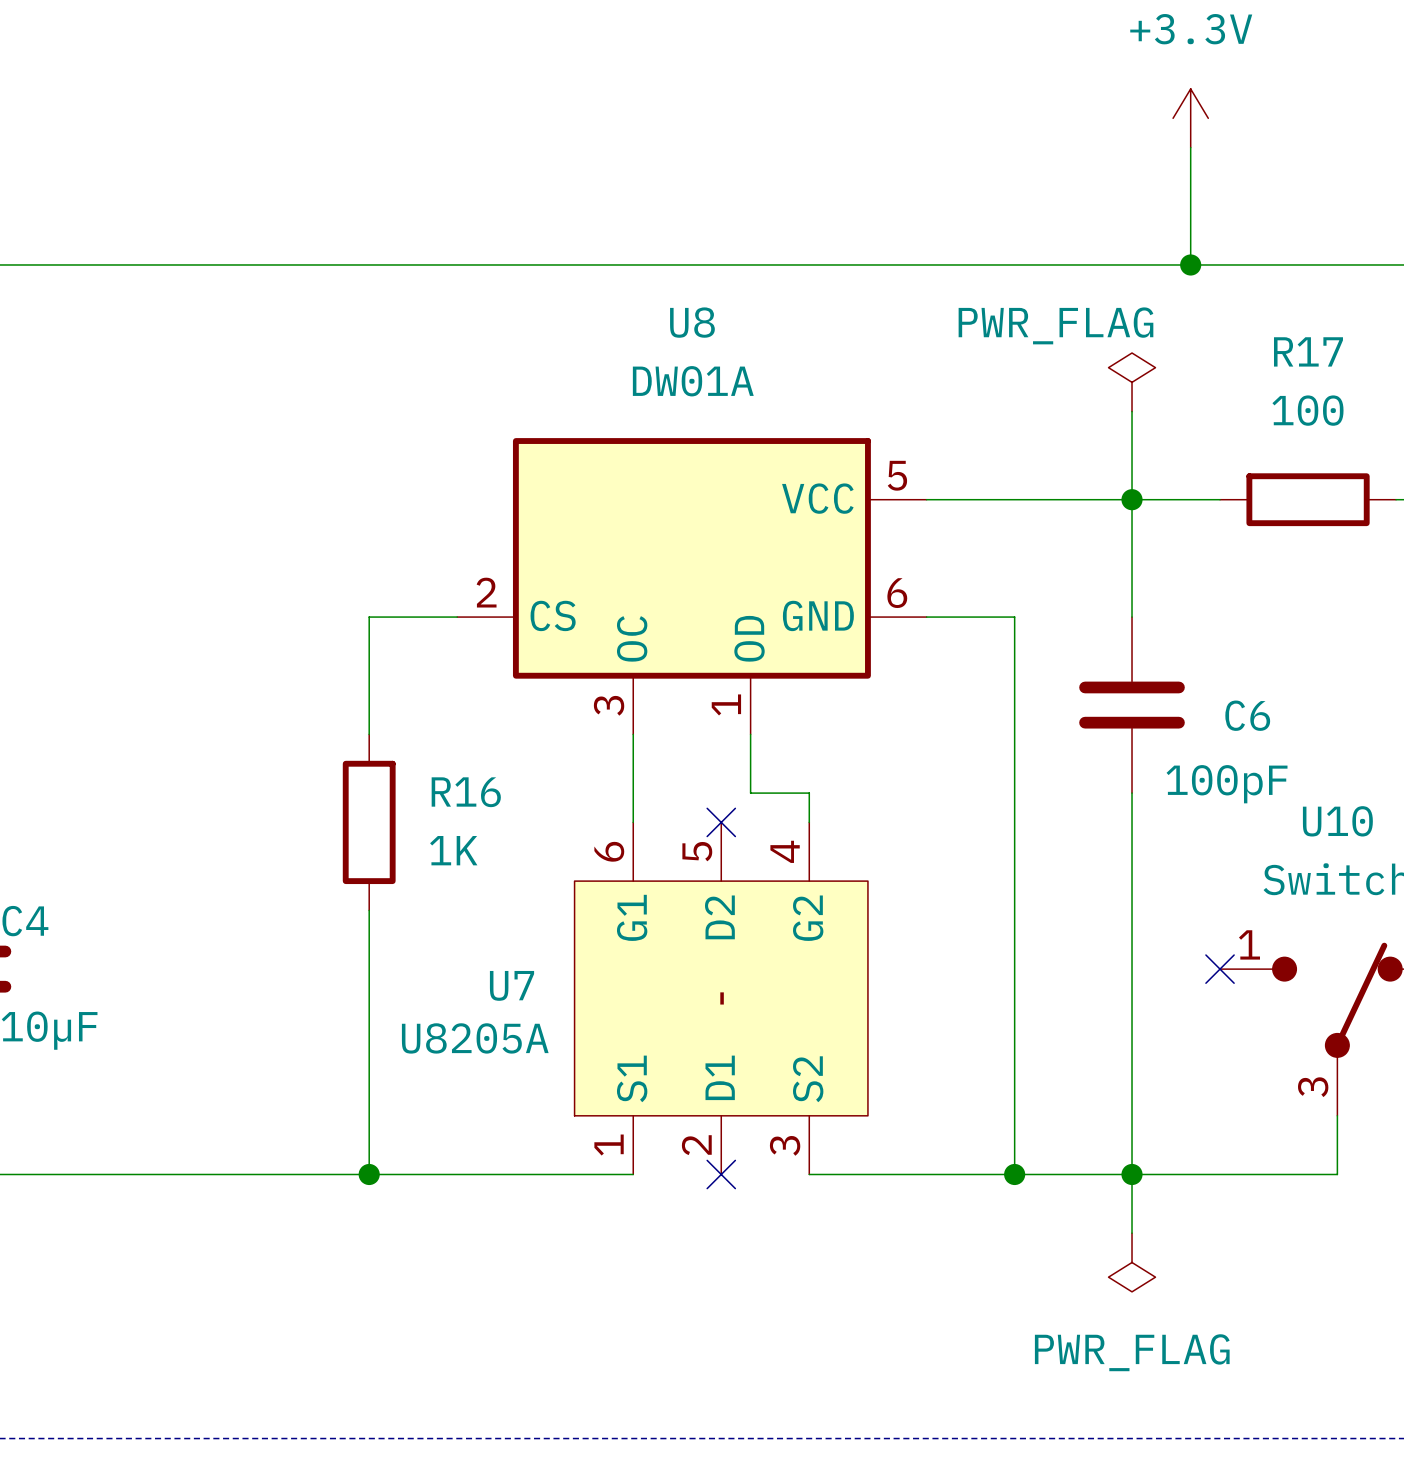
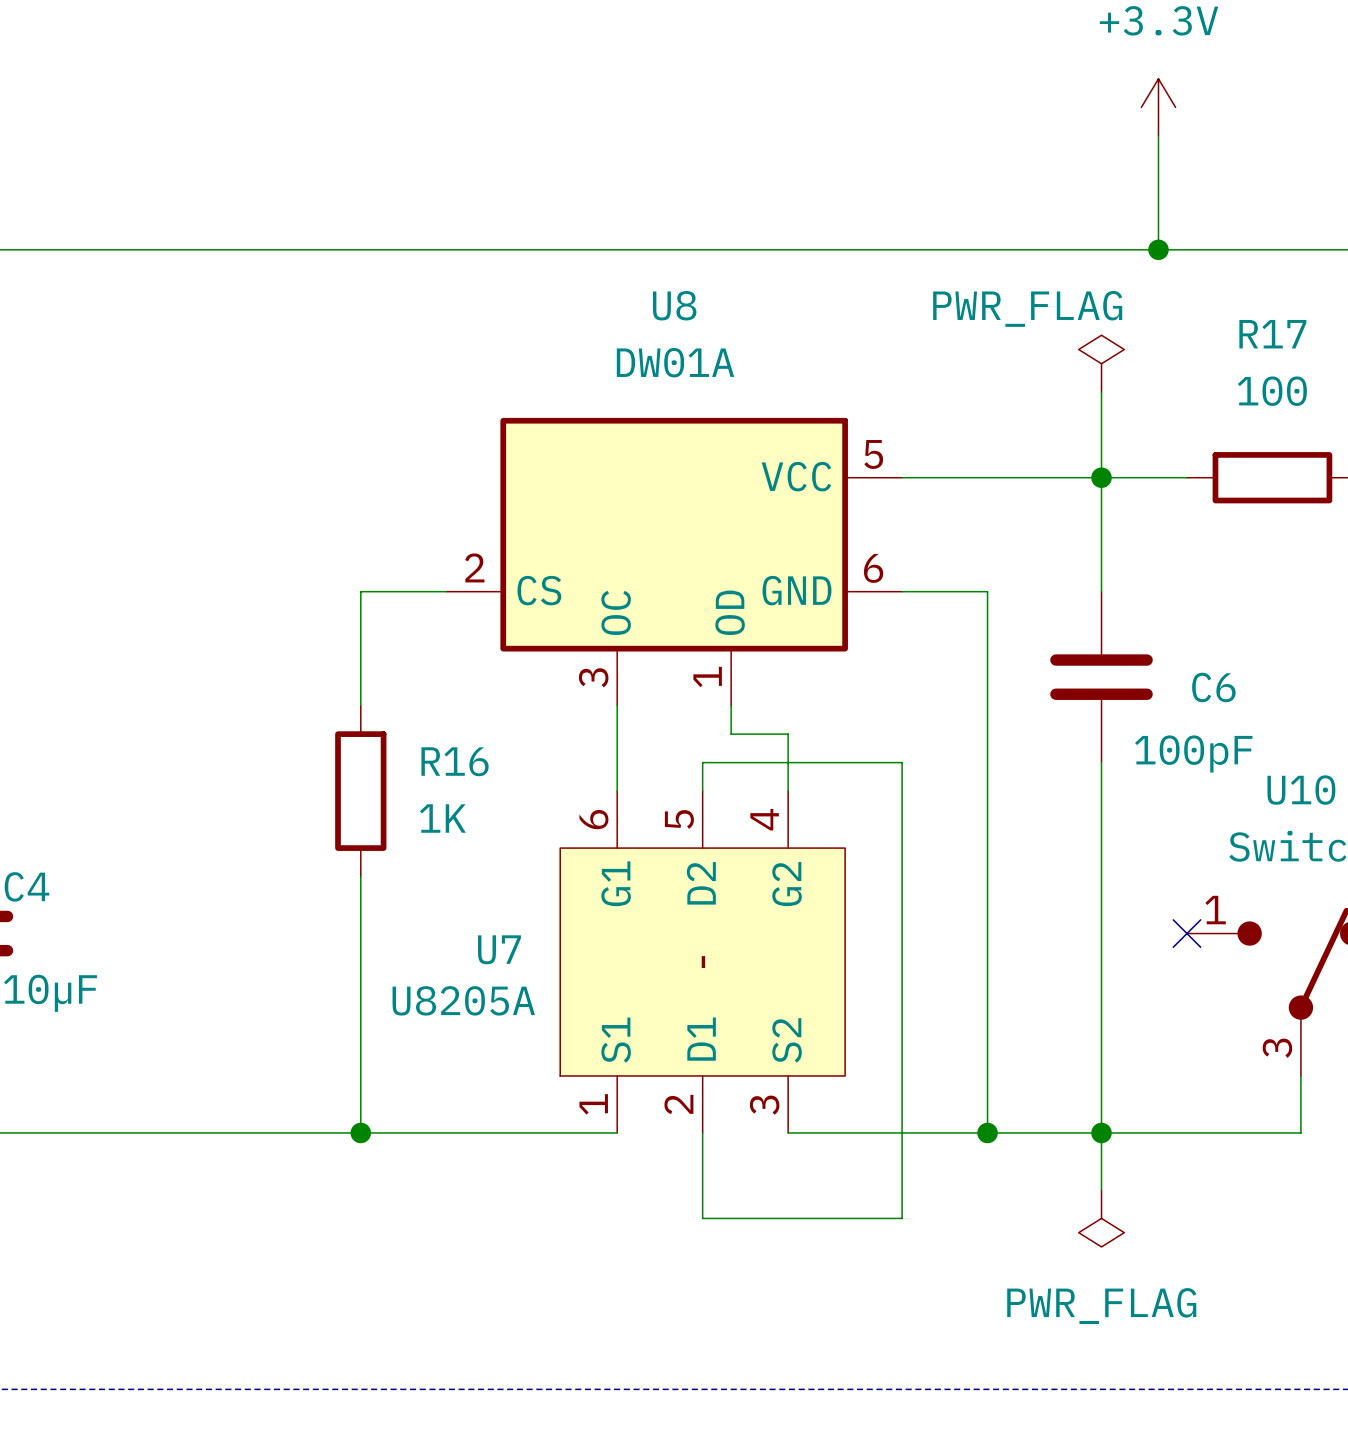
wire: (750, 763) (750, 793) -> (702, 791) (702, 762) (731, 762)
wire: none -> (731, 734) (788, 734) (788, 762) (902, 762) (902, 1218) (702, 1218) (702, 1132)
no-connect mark: (721, 822) -> none
no-connect mark: (721, 1174) -> none

